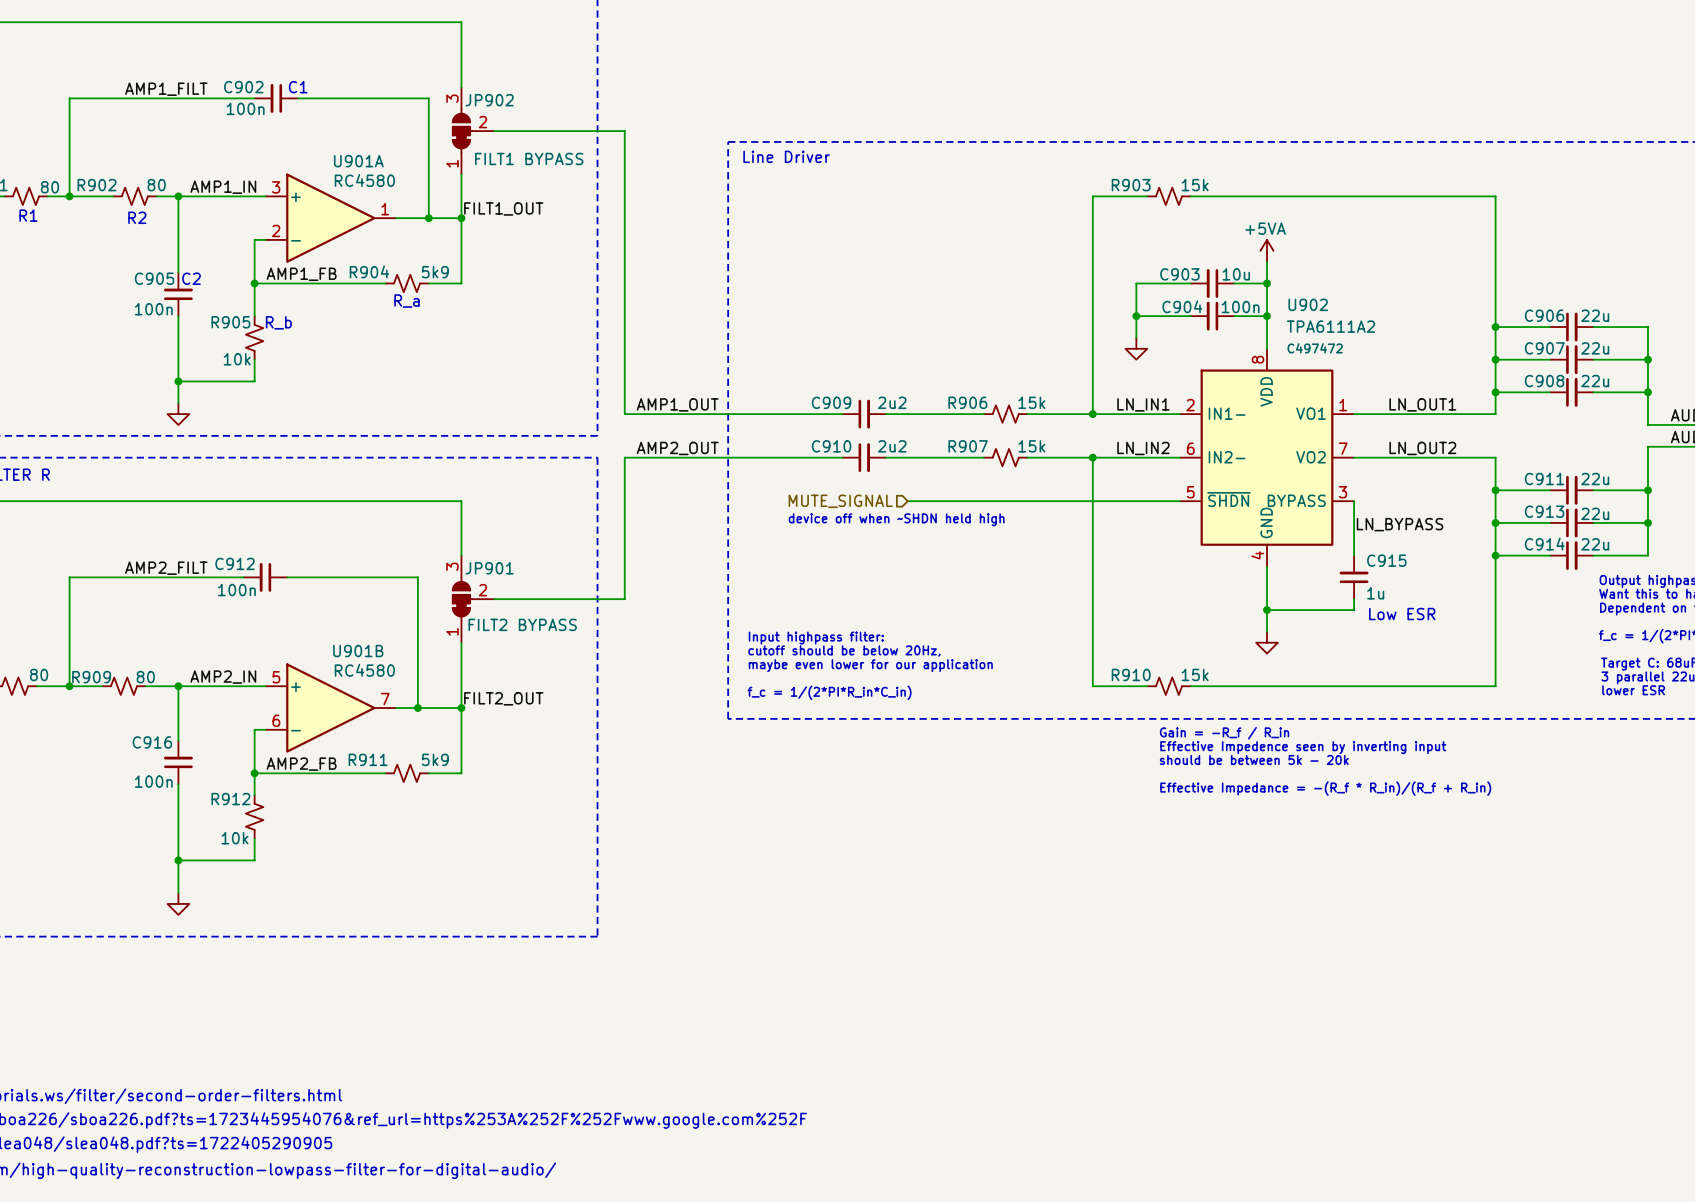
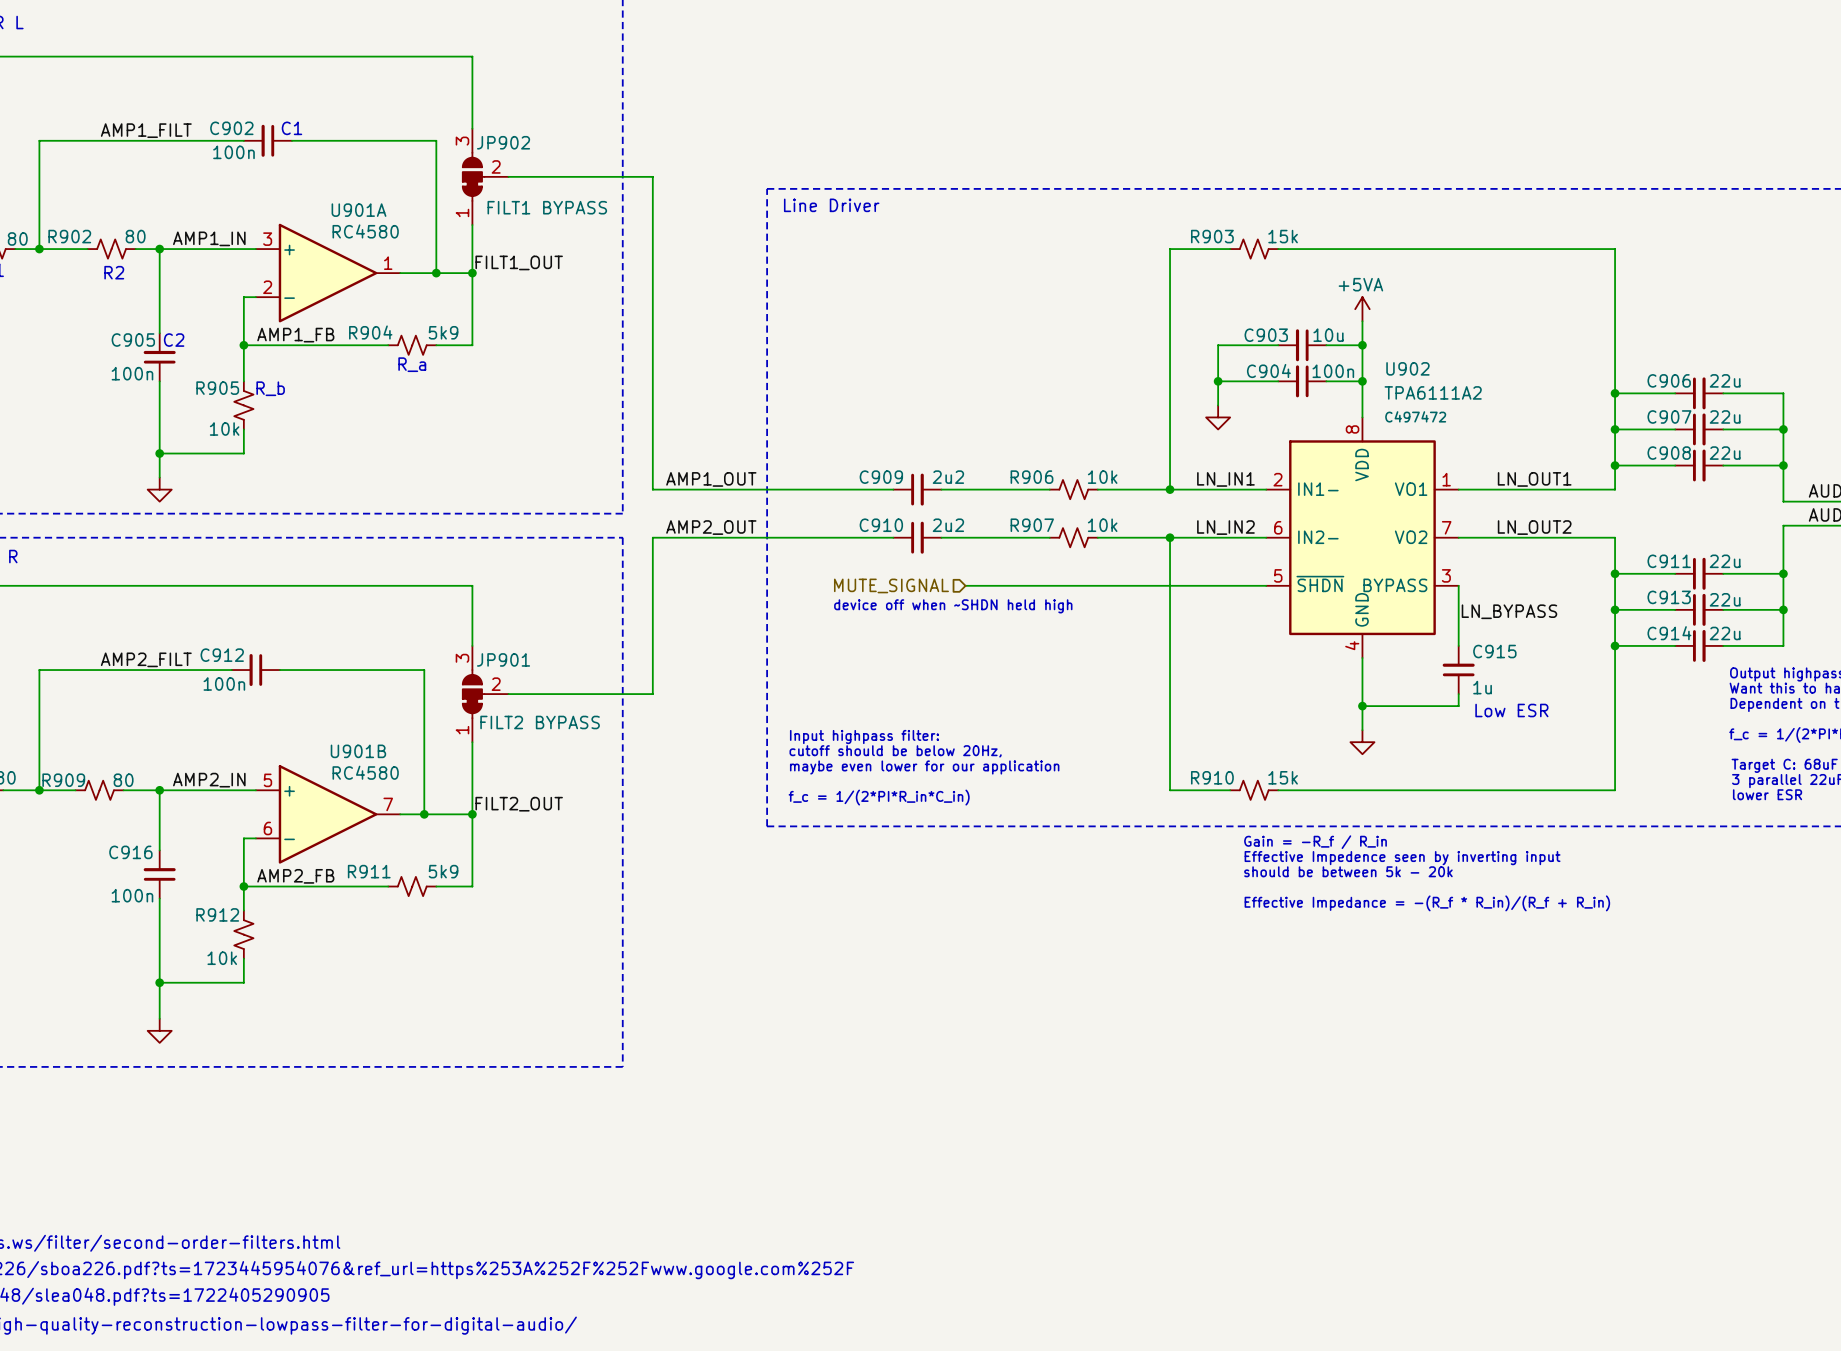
R906 value: 15k (1031, 402) -> 10k (1102, 477)
R907 value: 15k (1031, 446) -> 10k (1102, 525)

